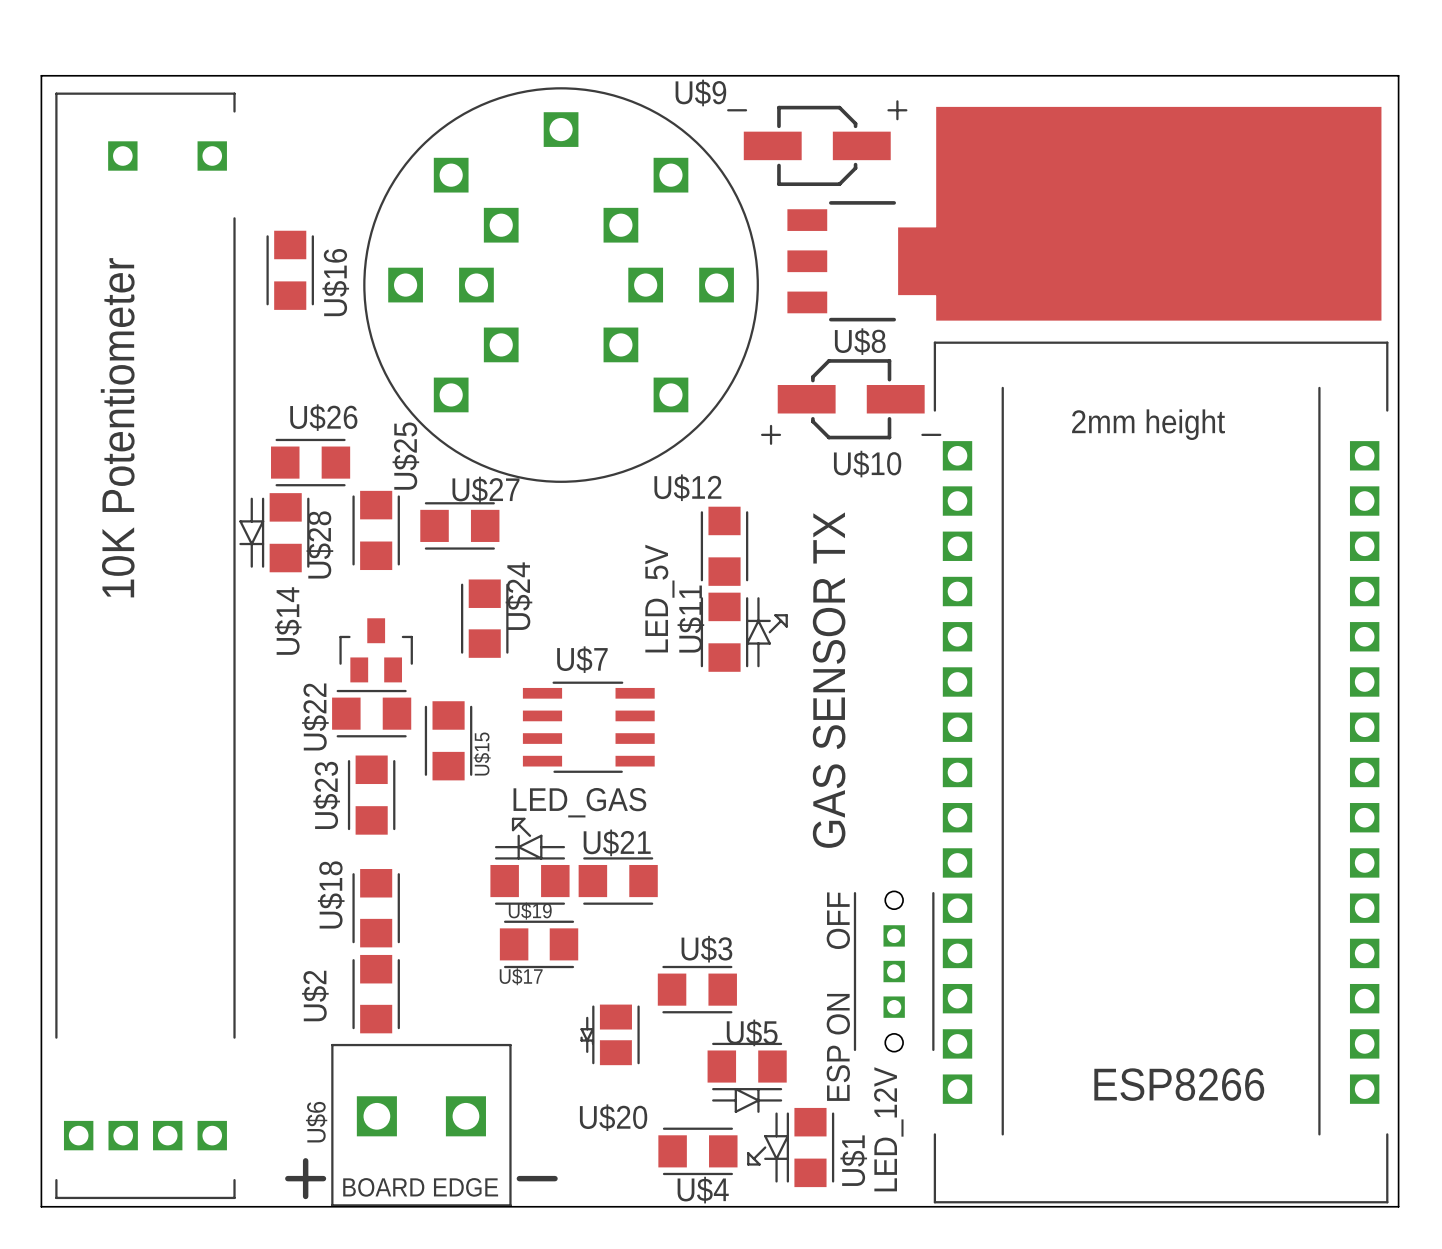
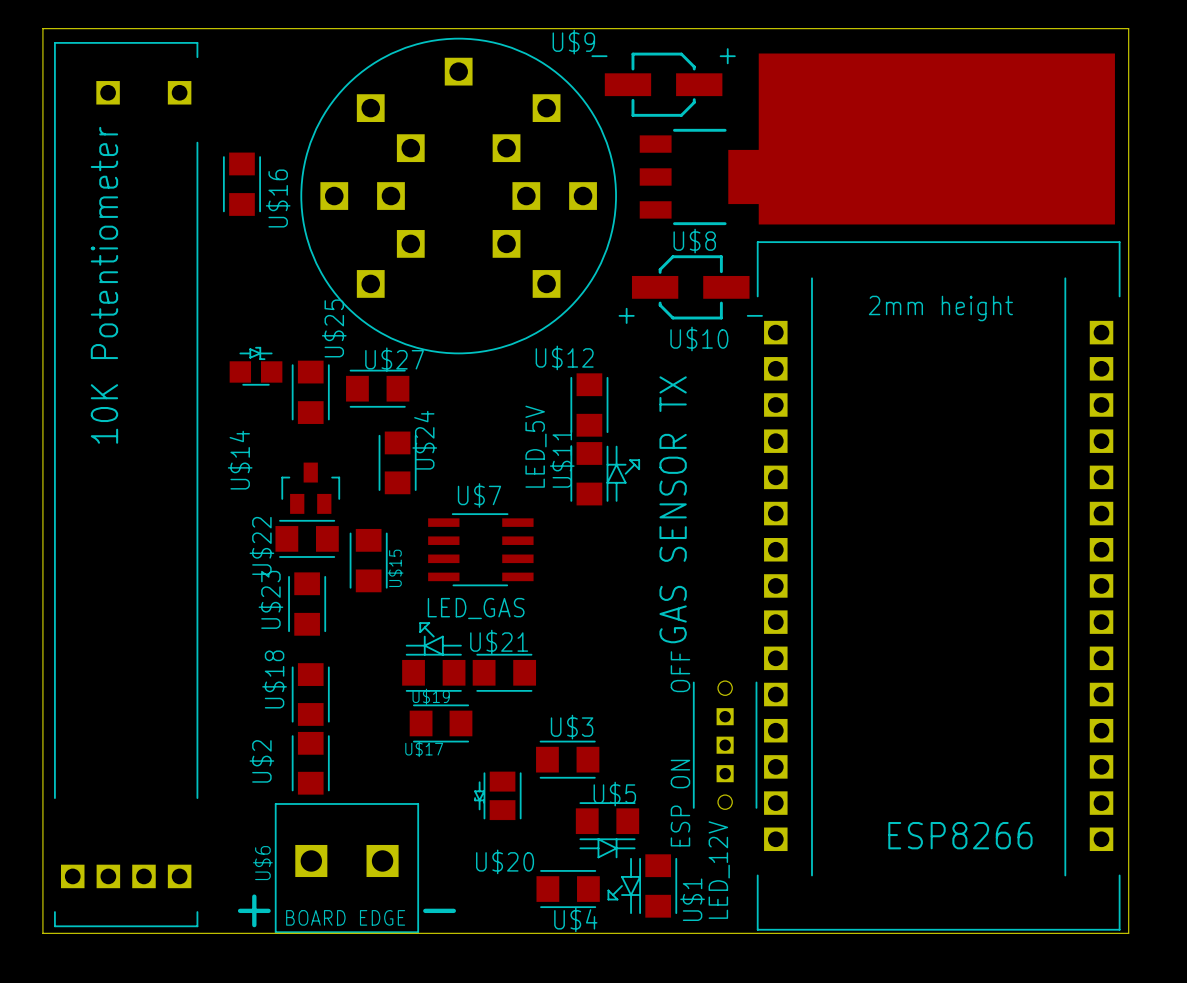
U$26: (310, 462) -> none
part: none -> (256, 366)
U$28: (274, 532) -> none

